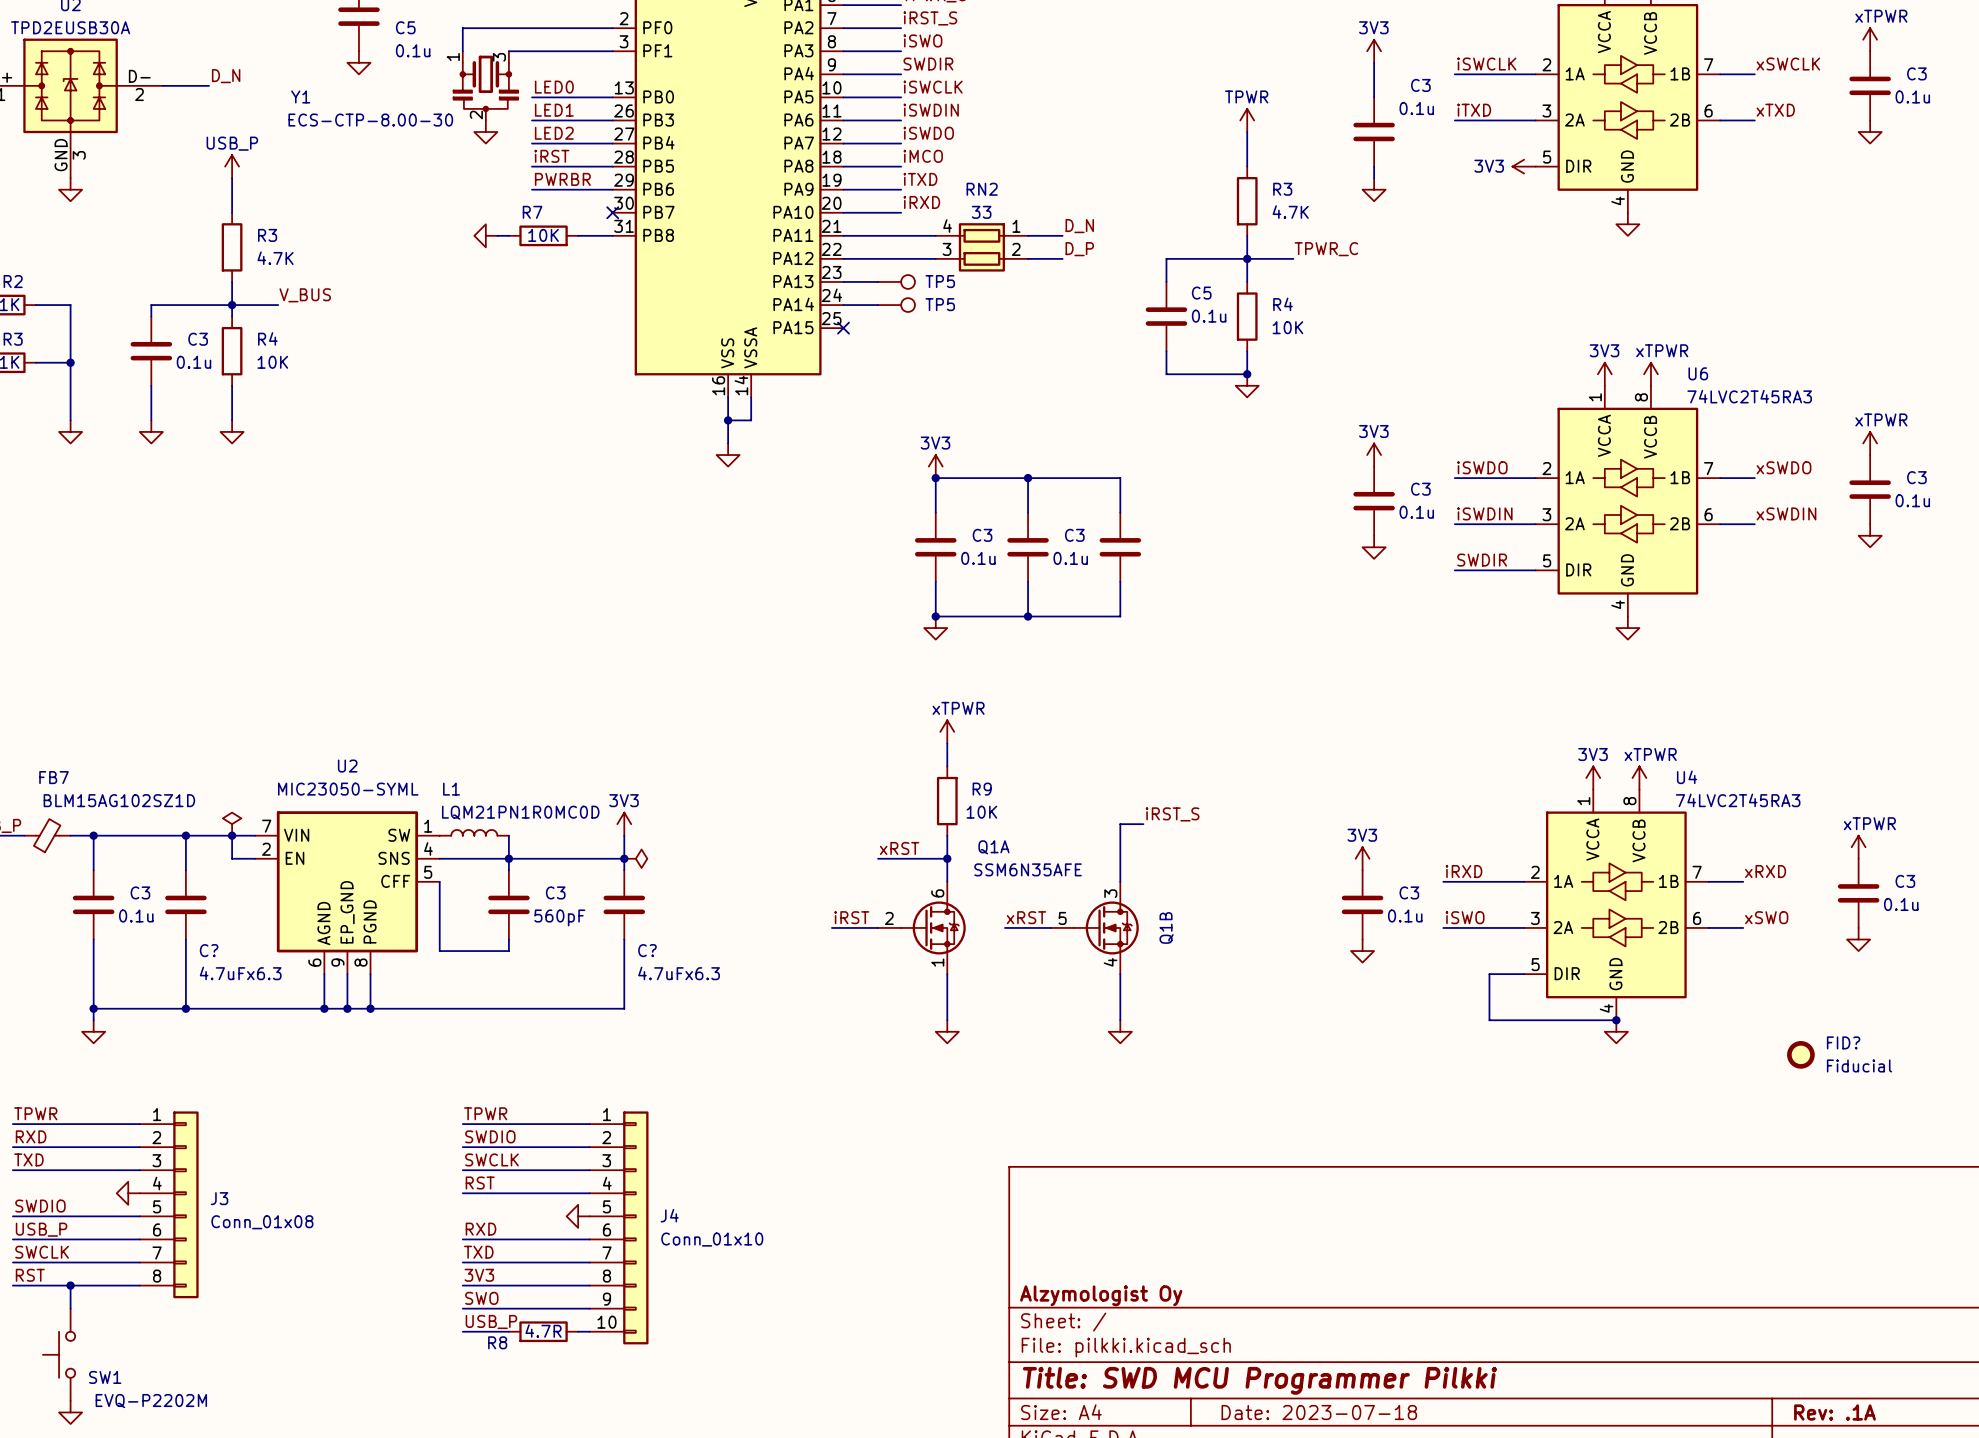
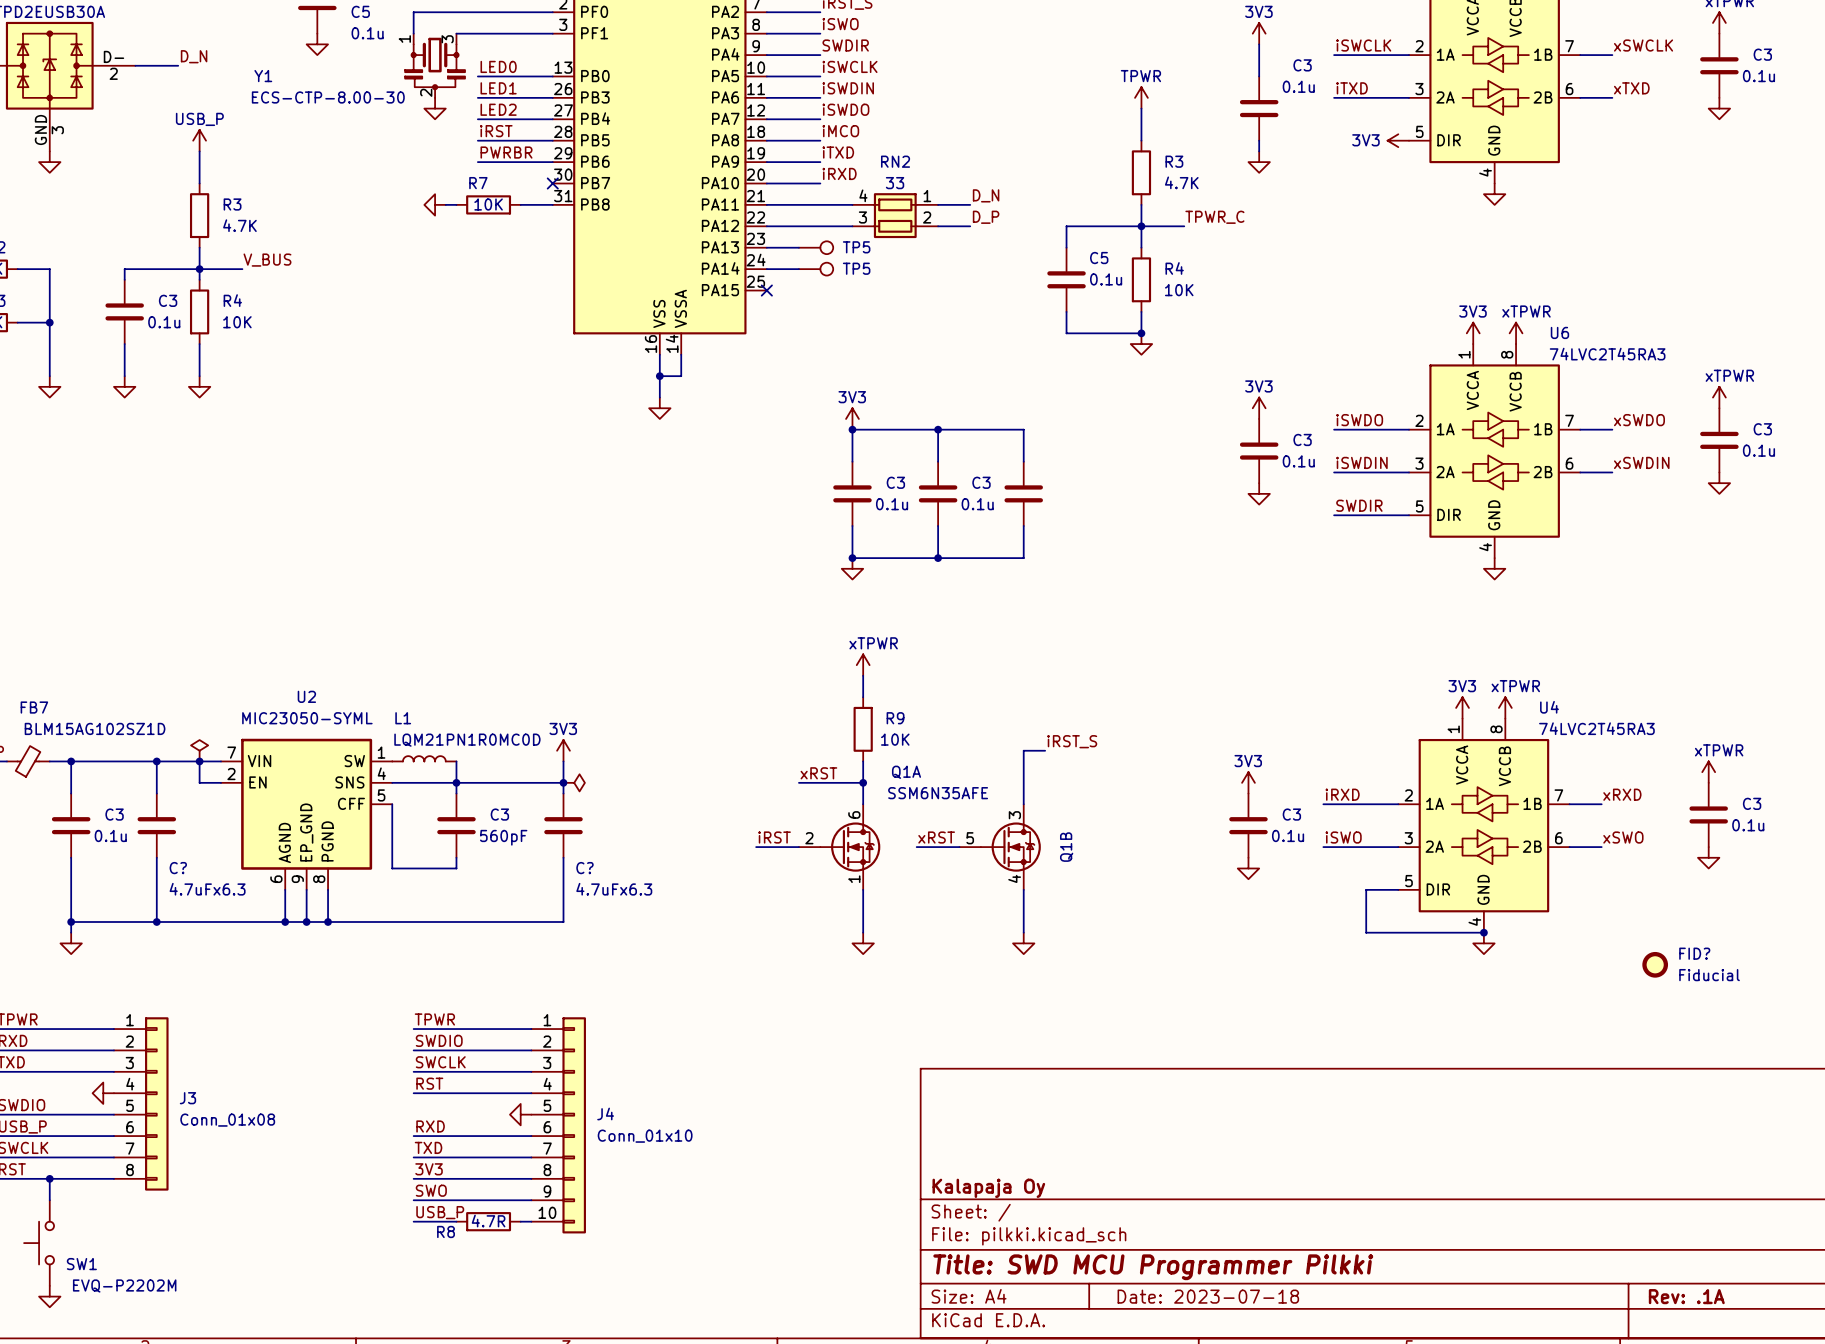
title block: Alzymologist Oy (1101, 1295) -> Kalapaja Oy (988, 1188)

